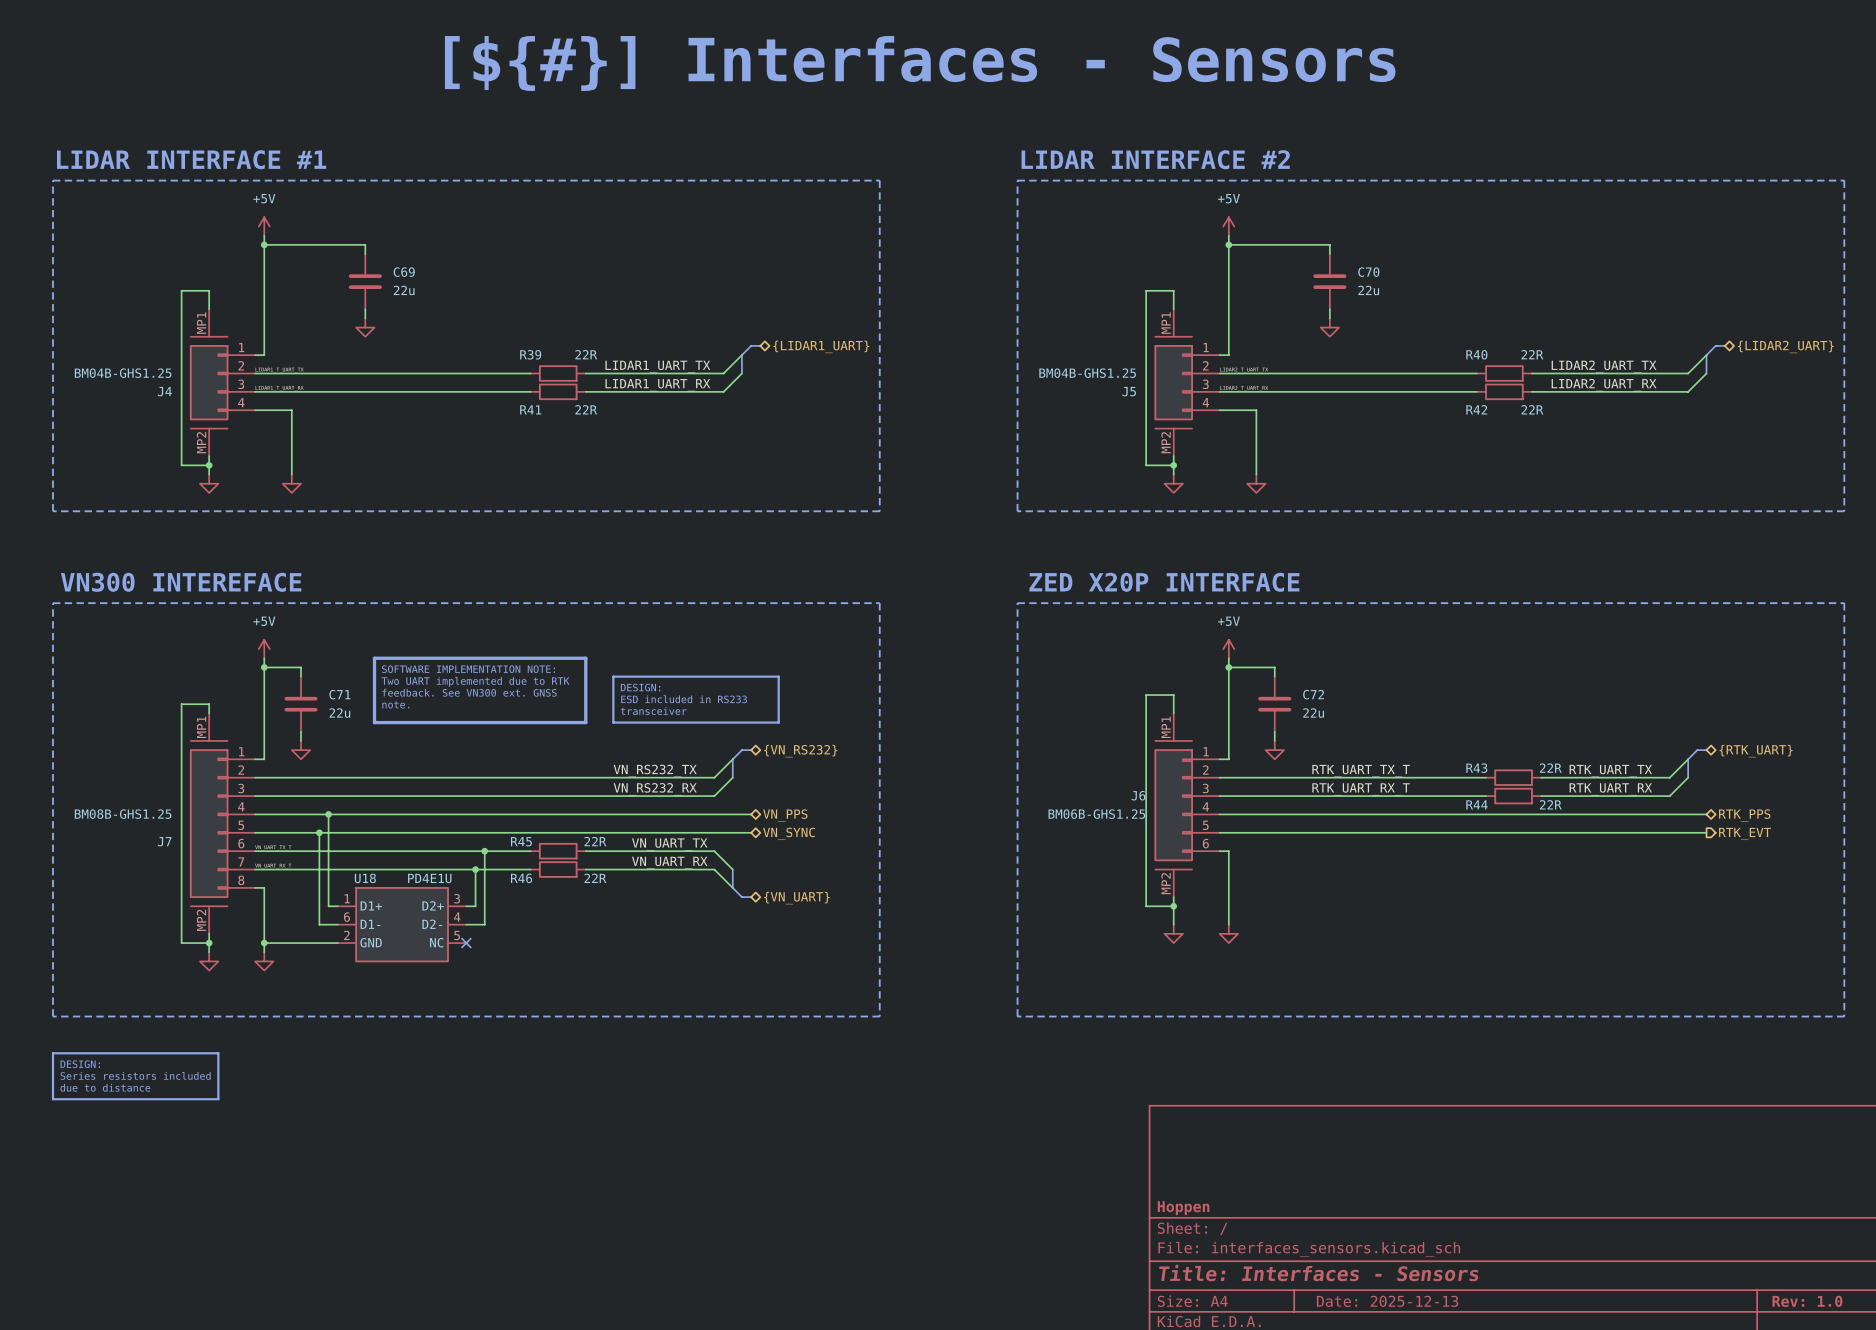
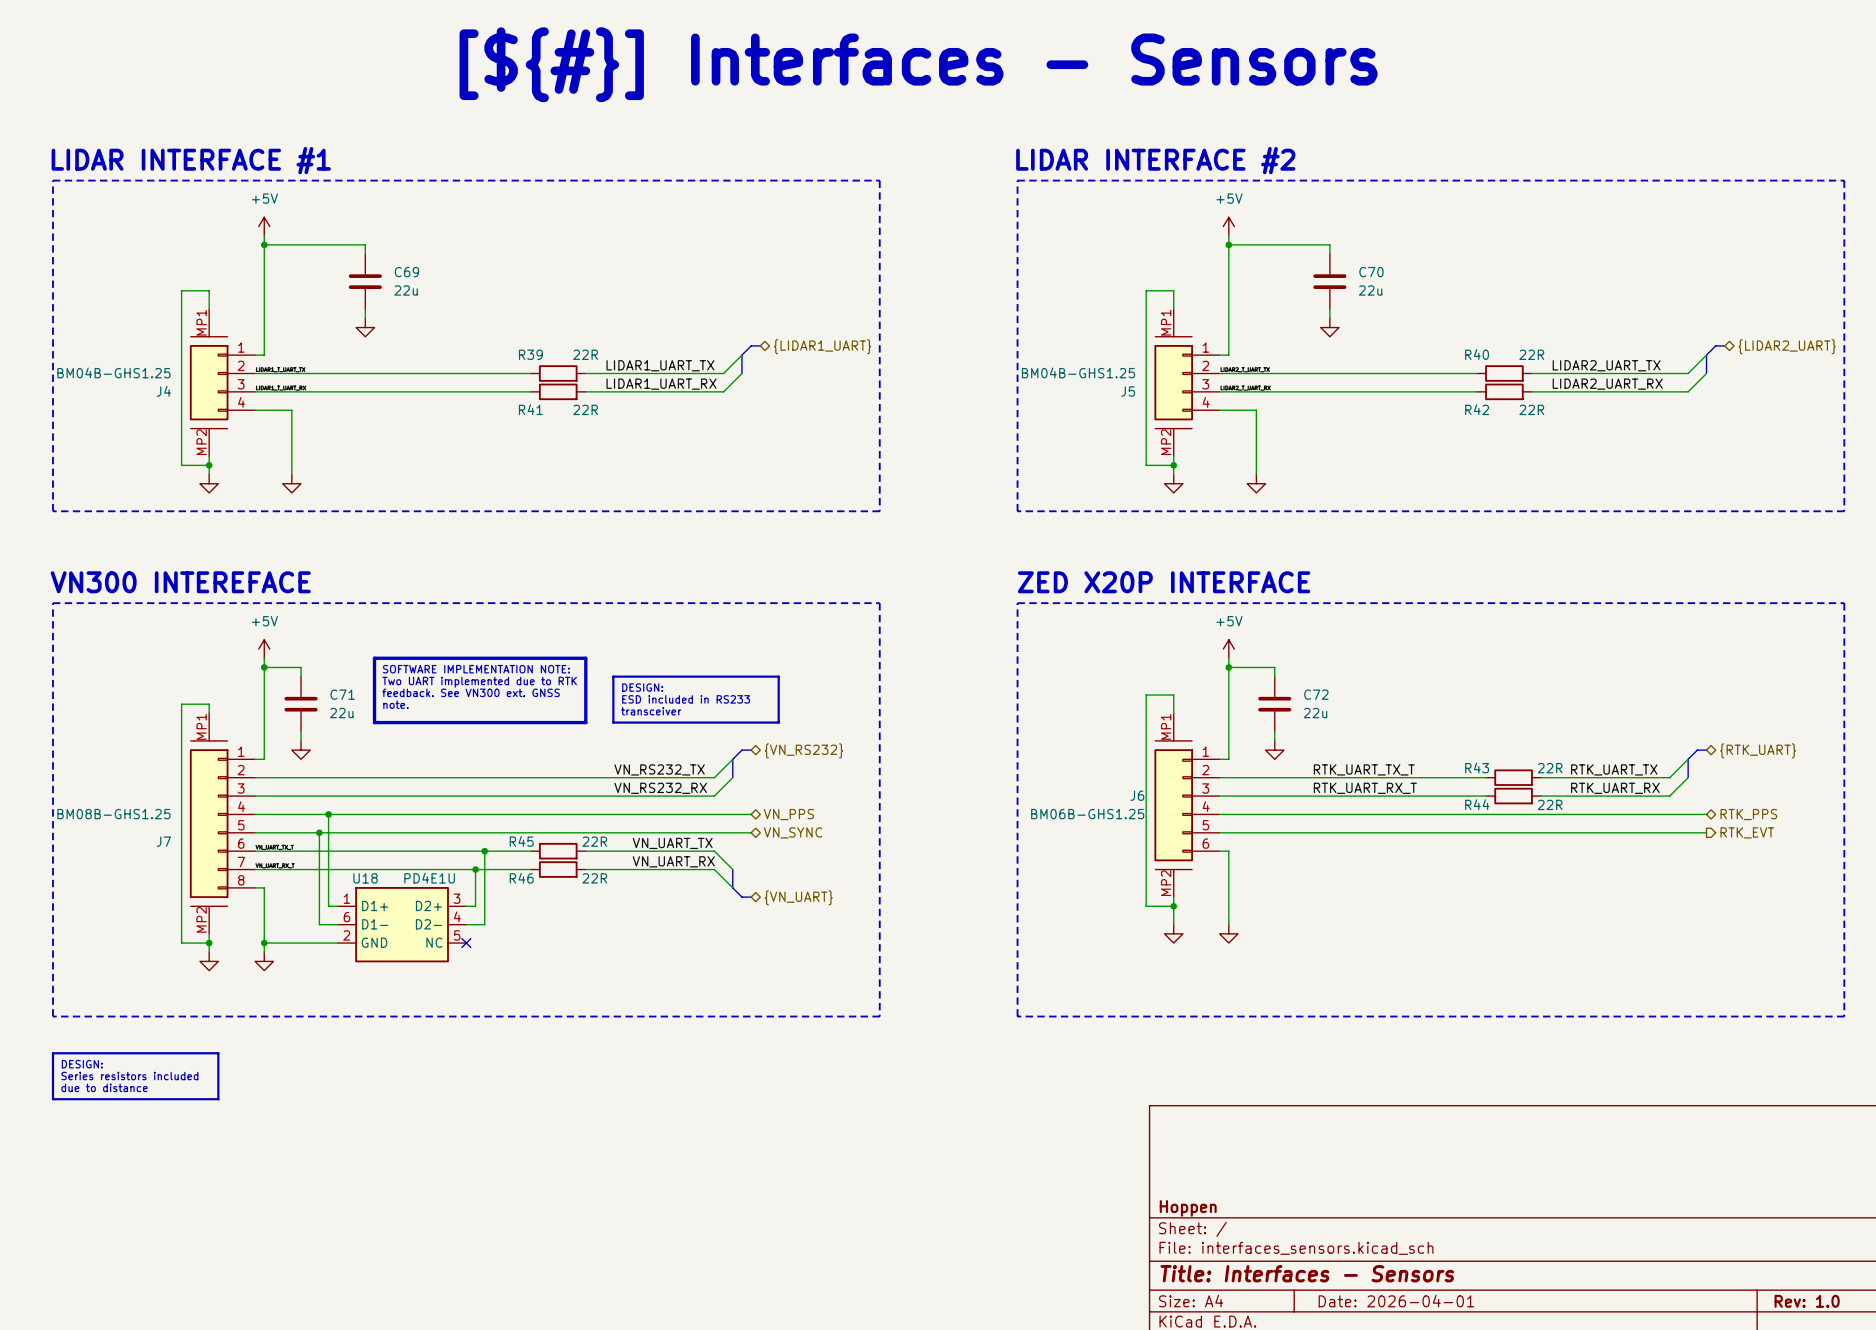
title block: Date: 2025-12-13 (1387, 1301) -> Date: 2026-04-01 (1396, 1301)

